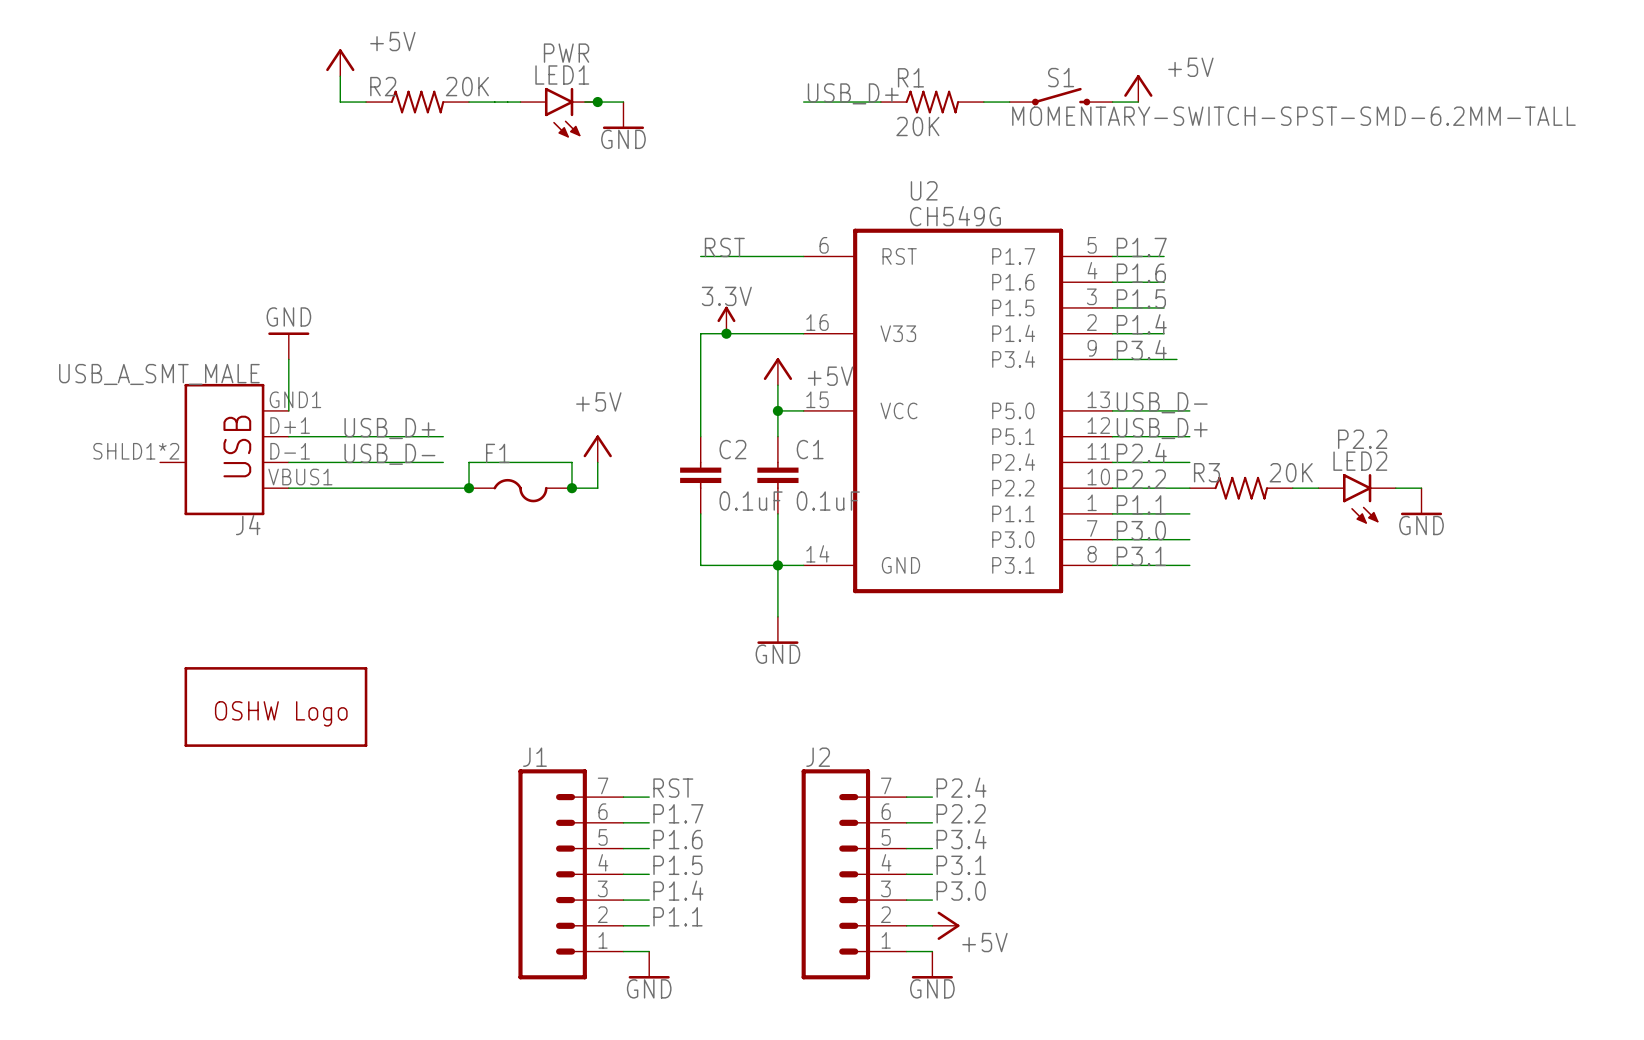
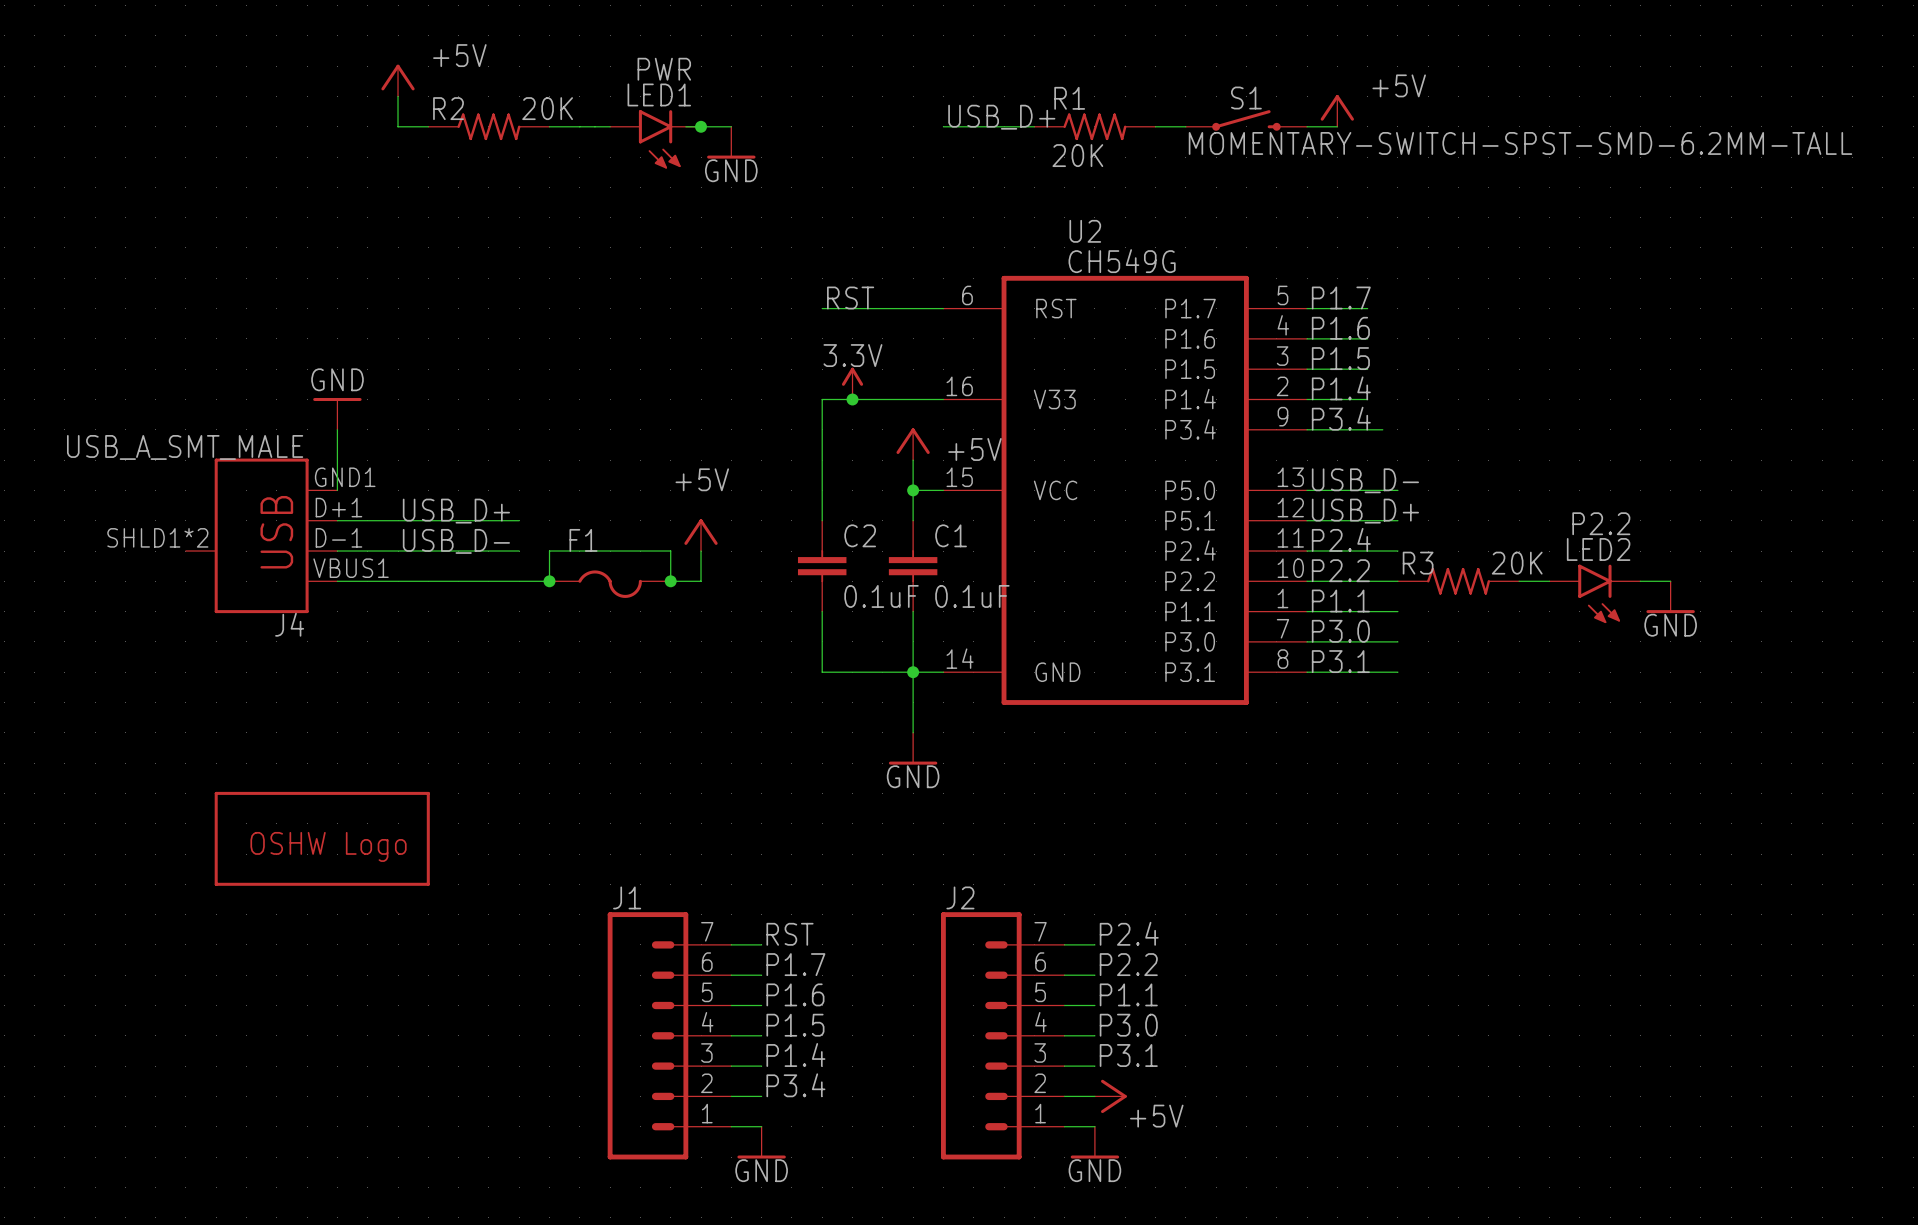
label: P3.4 (961, 839) -> P1.1 (1128, 994)
label: P3.1 (961, 865) -> P3.0 (1128, 1025)
label: P3.0 (961, 891) -> P3.1 (1128, 1055)
label: P1.1 (677, 916) -> P3.4 (795, 1085)

